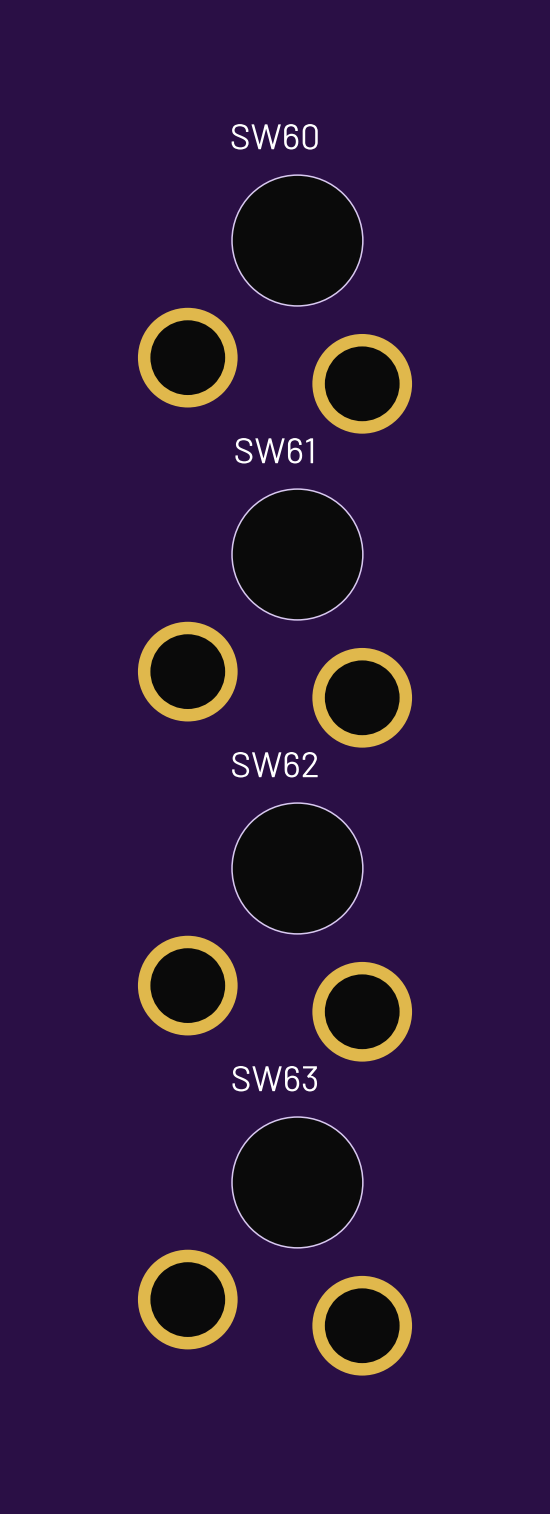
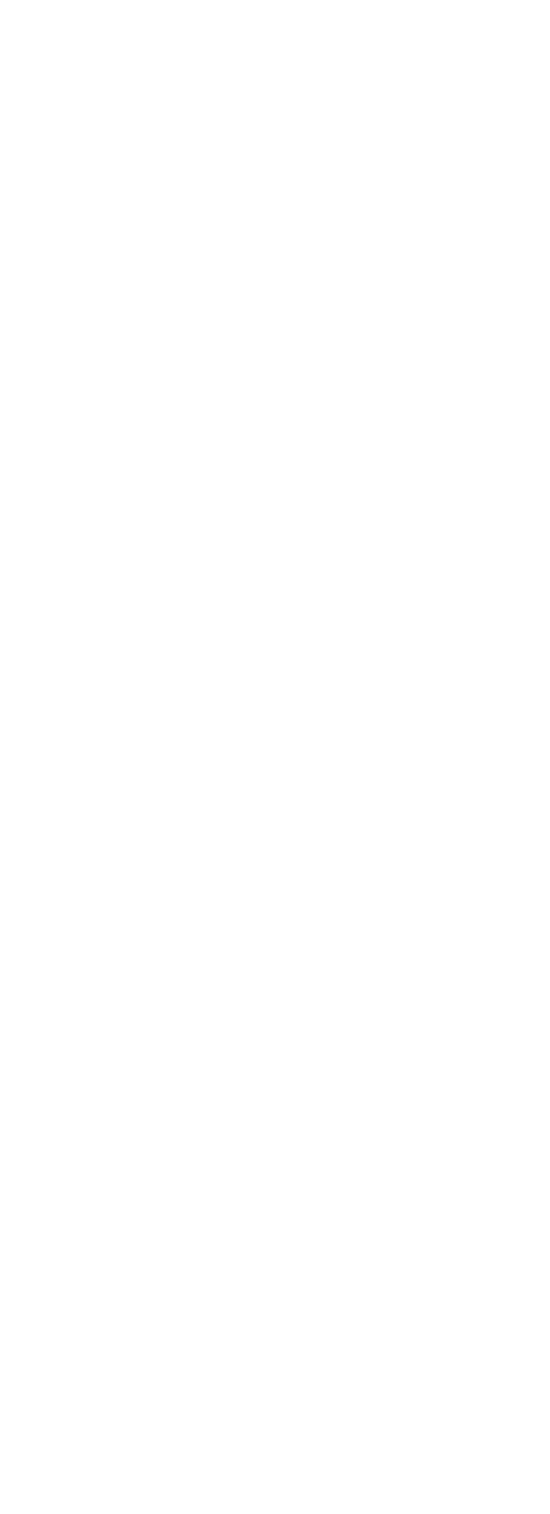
SW60: (275, 304) -> none
SW61: (275, 618) -> none
SW62: (275, 932) -> none
SW63: (275, 1246) -> none

